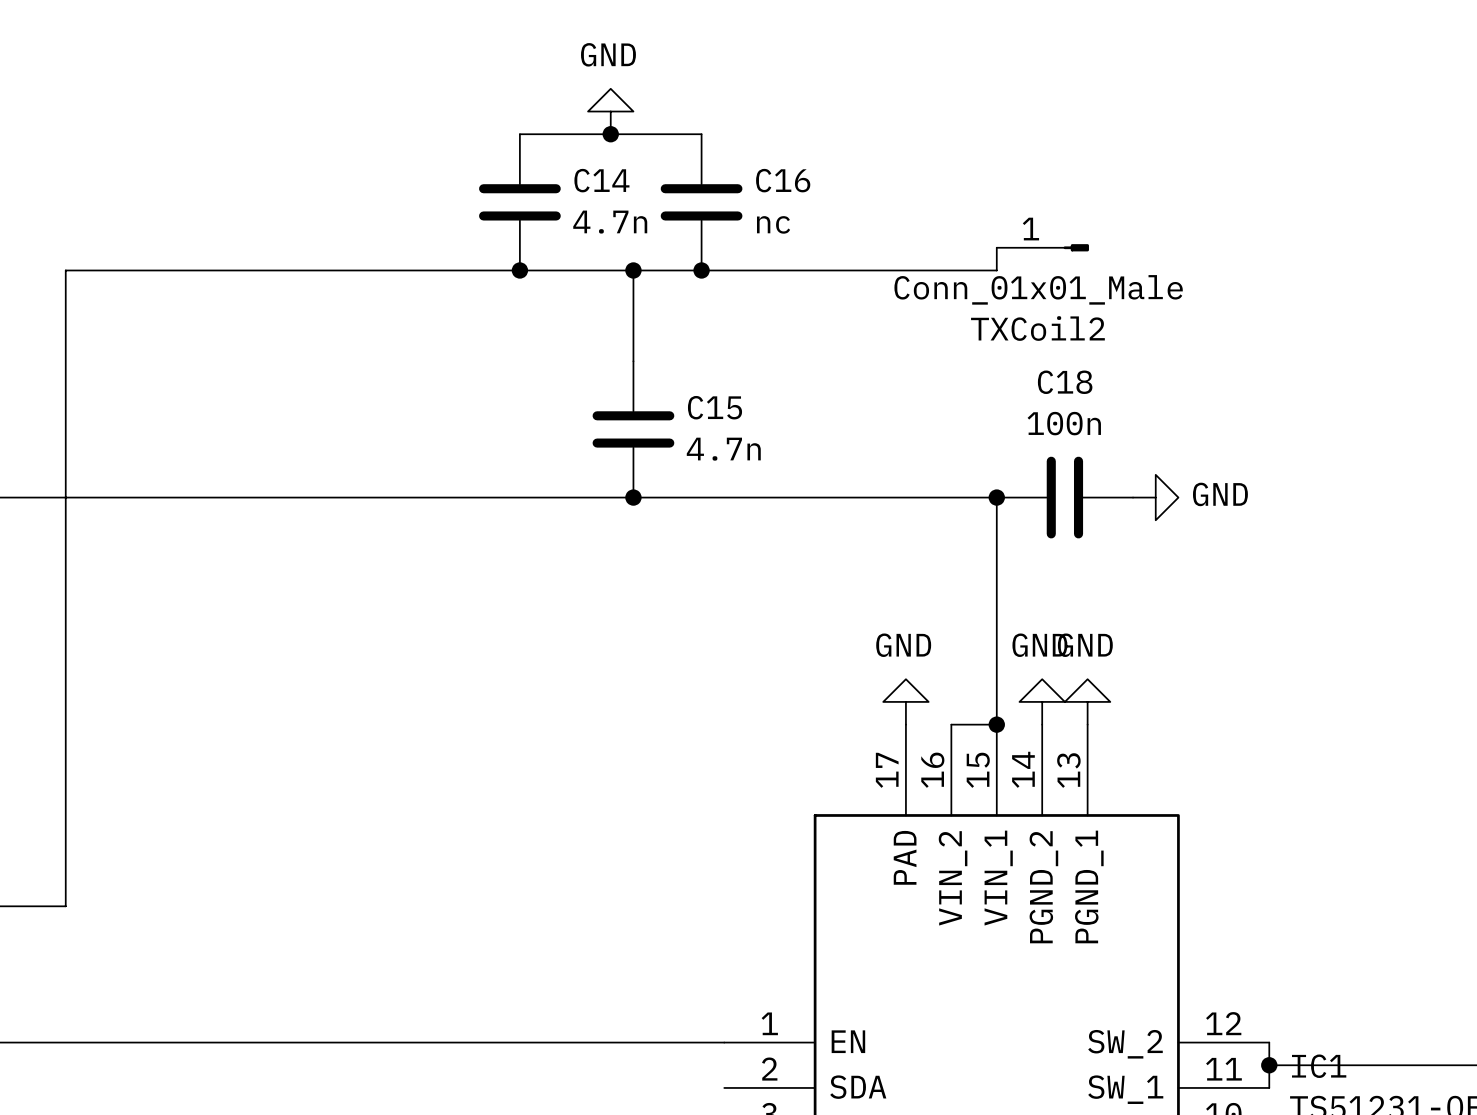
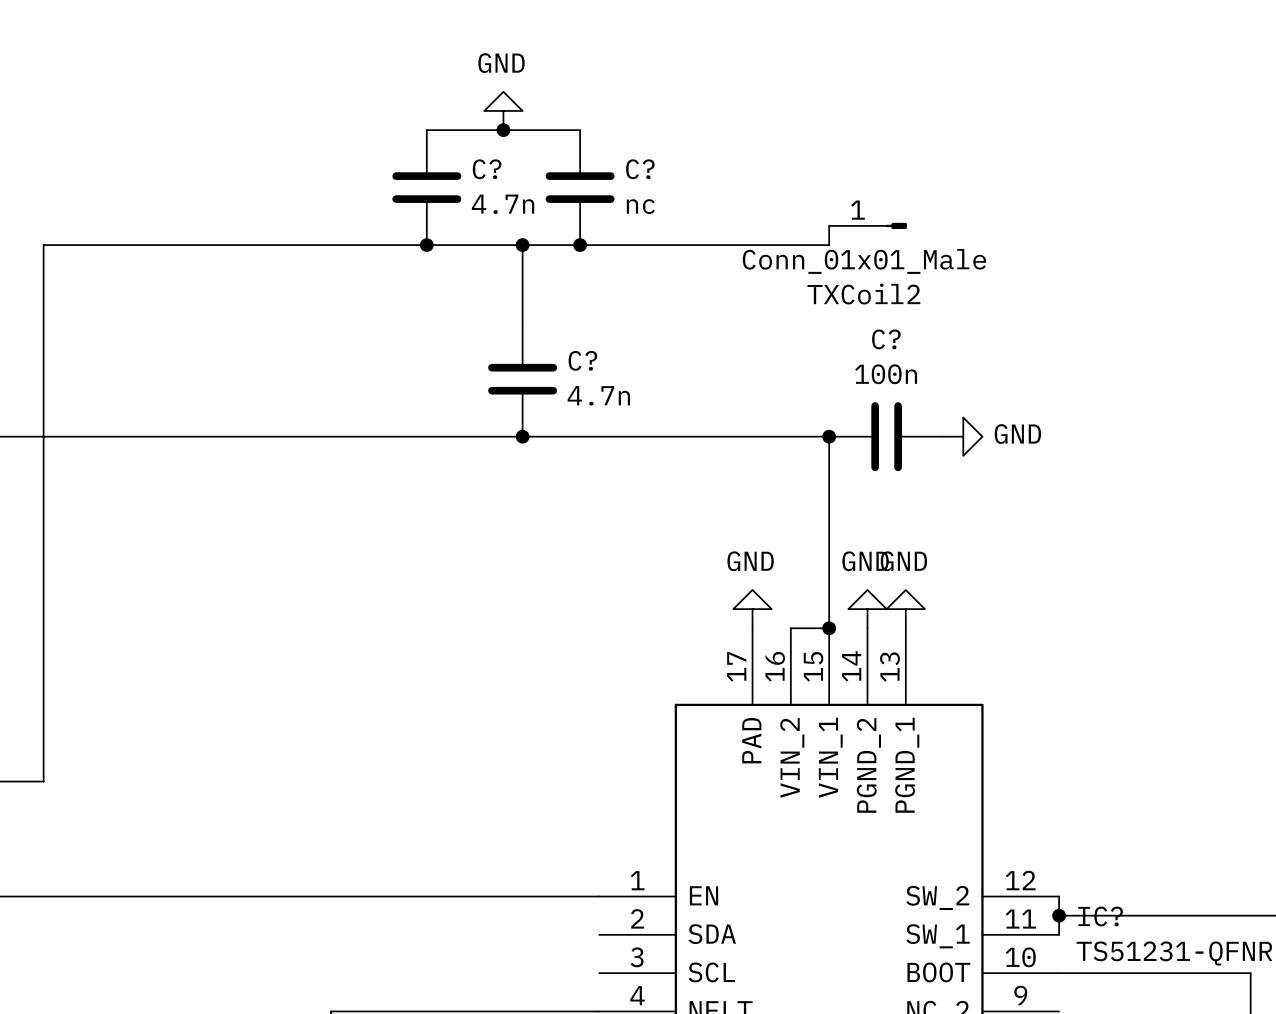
C14 name: C14 (601, 180) -> C? (487, 169)
C16 name: C16 (783, 180) -> C? (640, 169)
C18 name: C18 (1065, 382) -> C? (886, 339)
C15 name: C15 (715, 407) -> C? (582, 360)
IC1 name: IC1 (1319, 1066) -> IC? (1100, 916)

